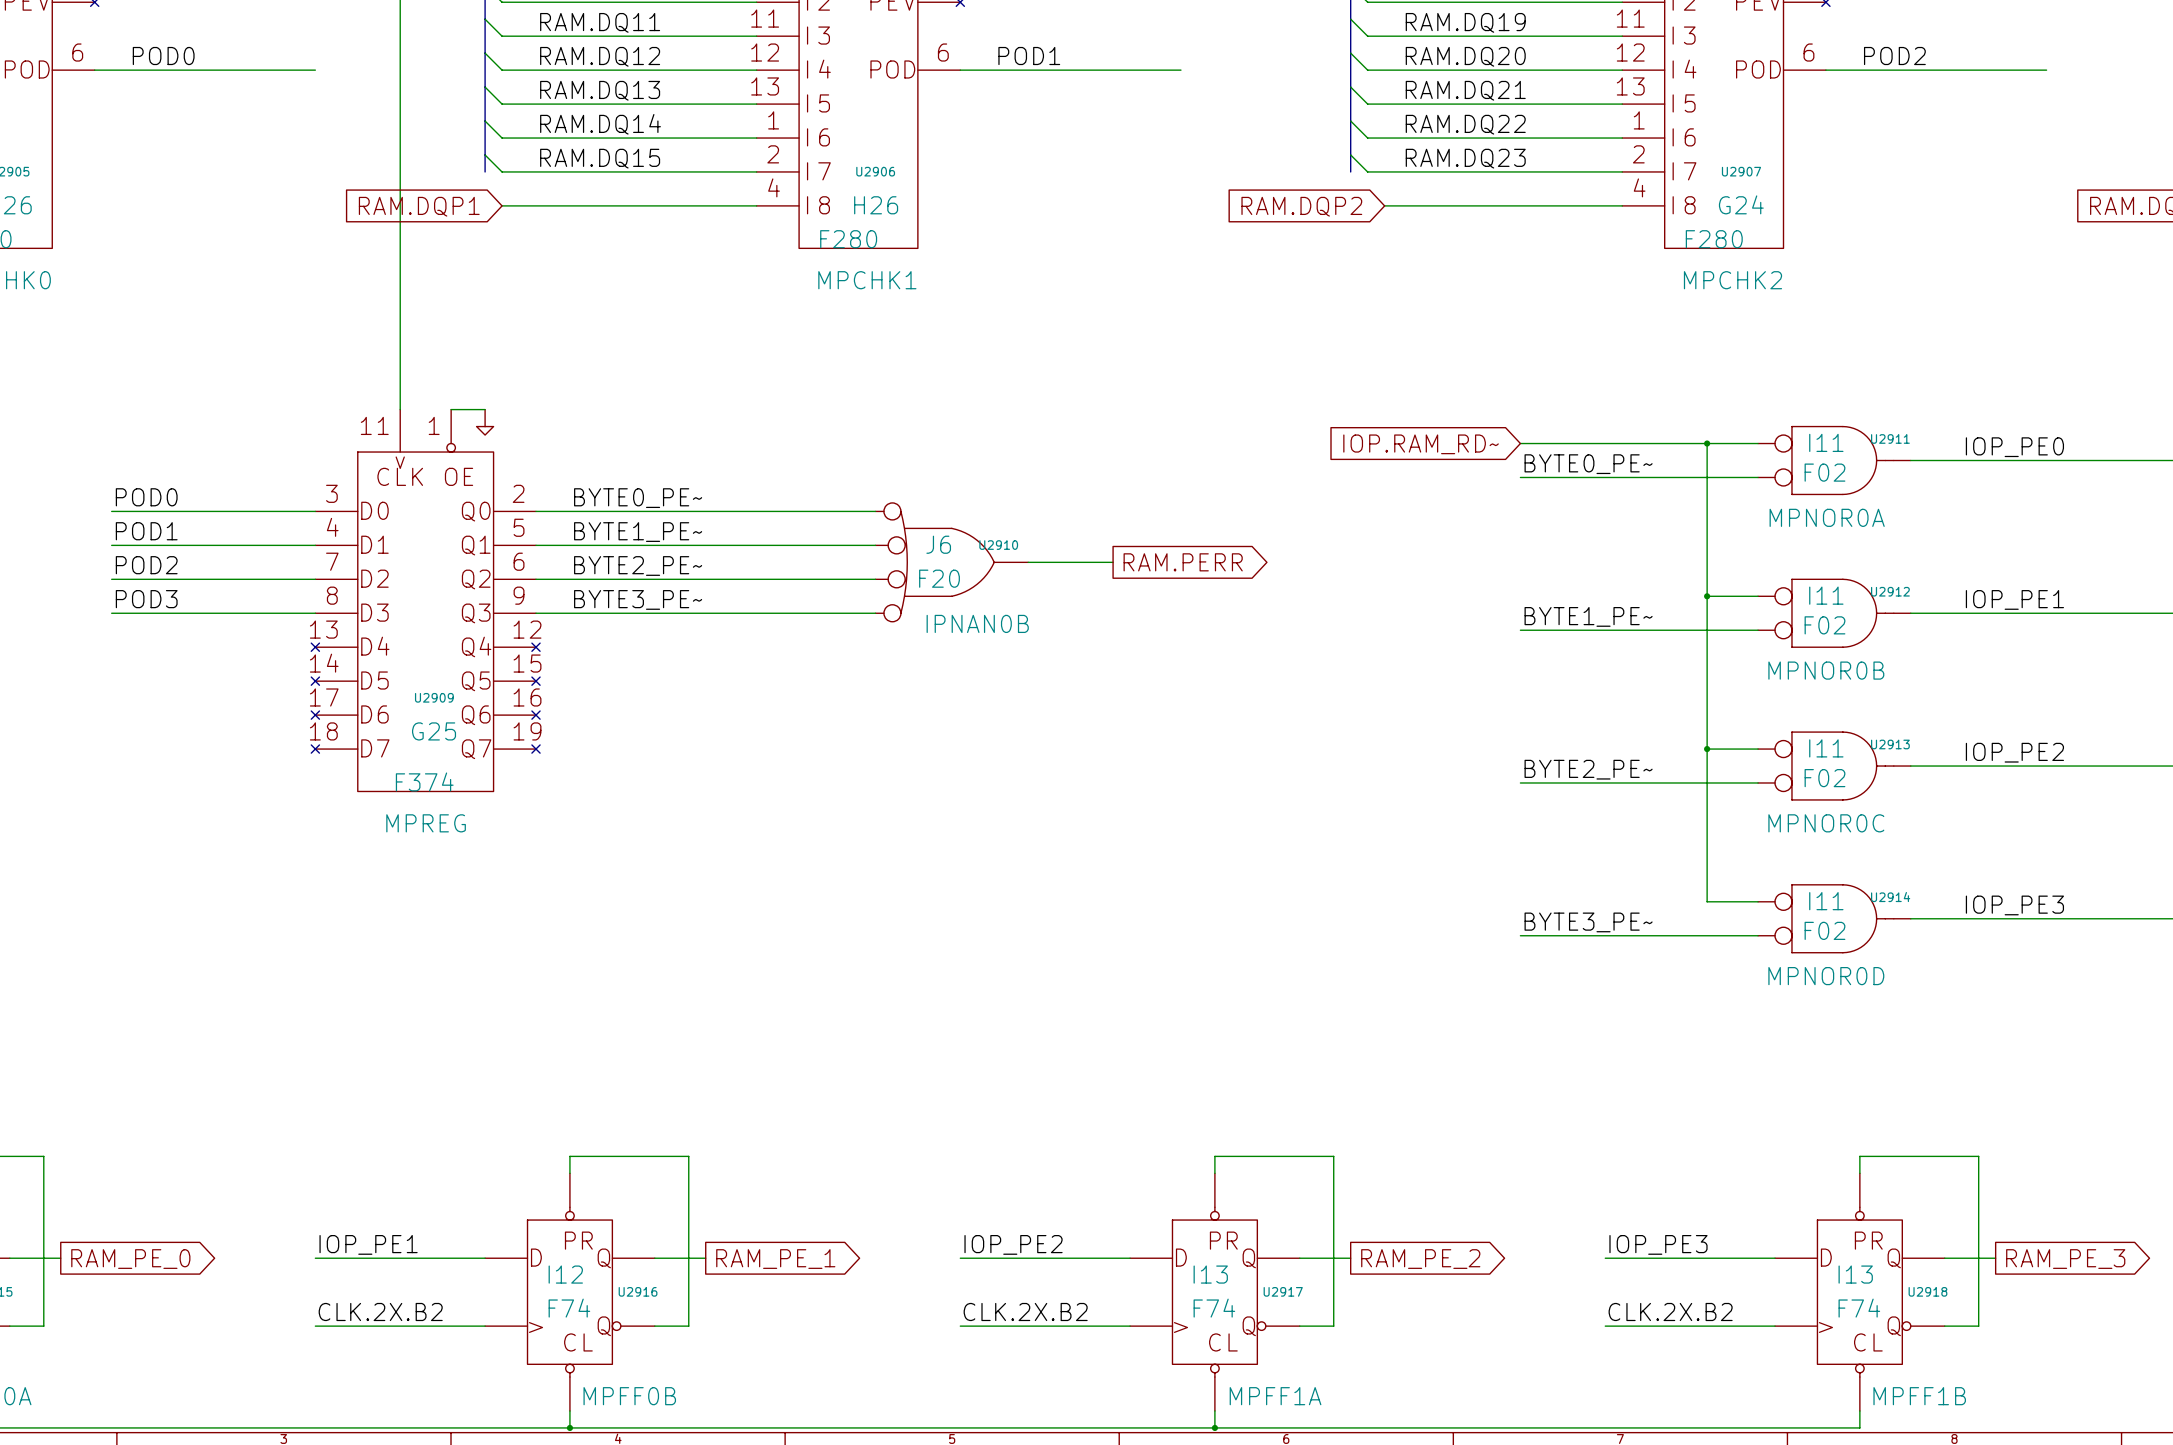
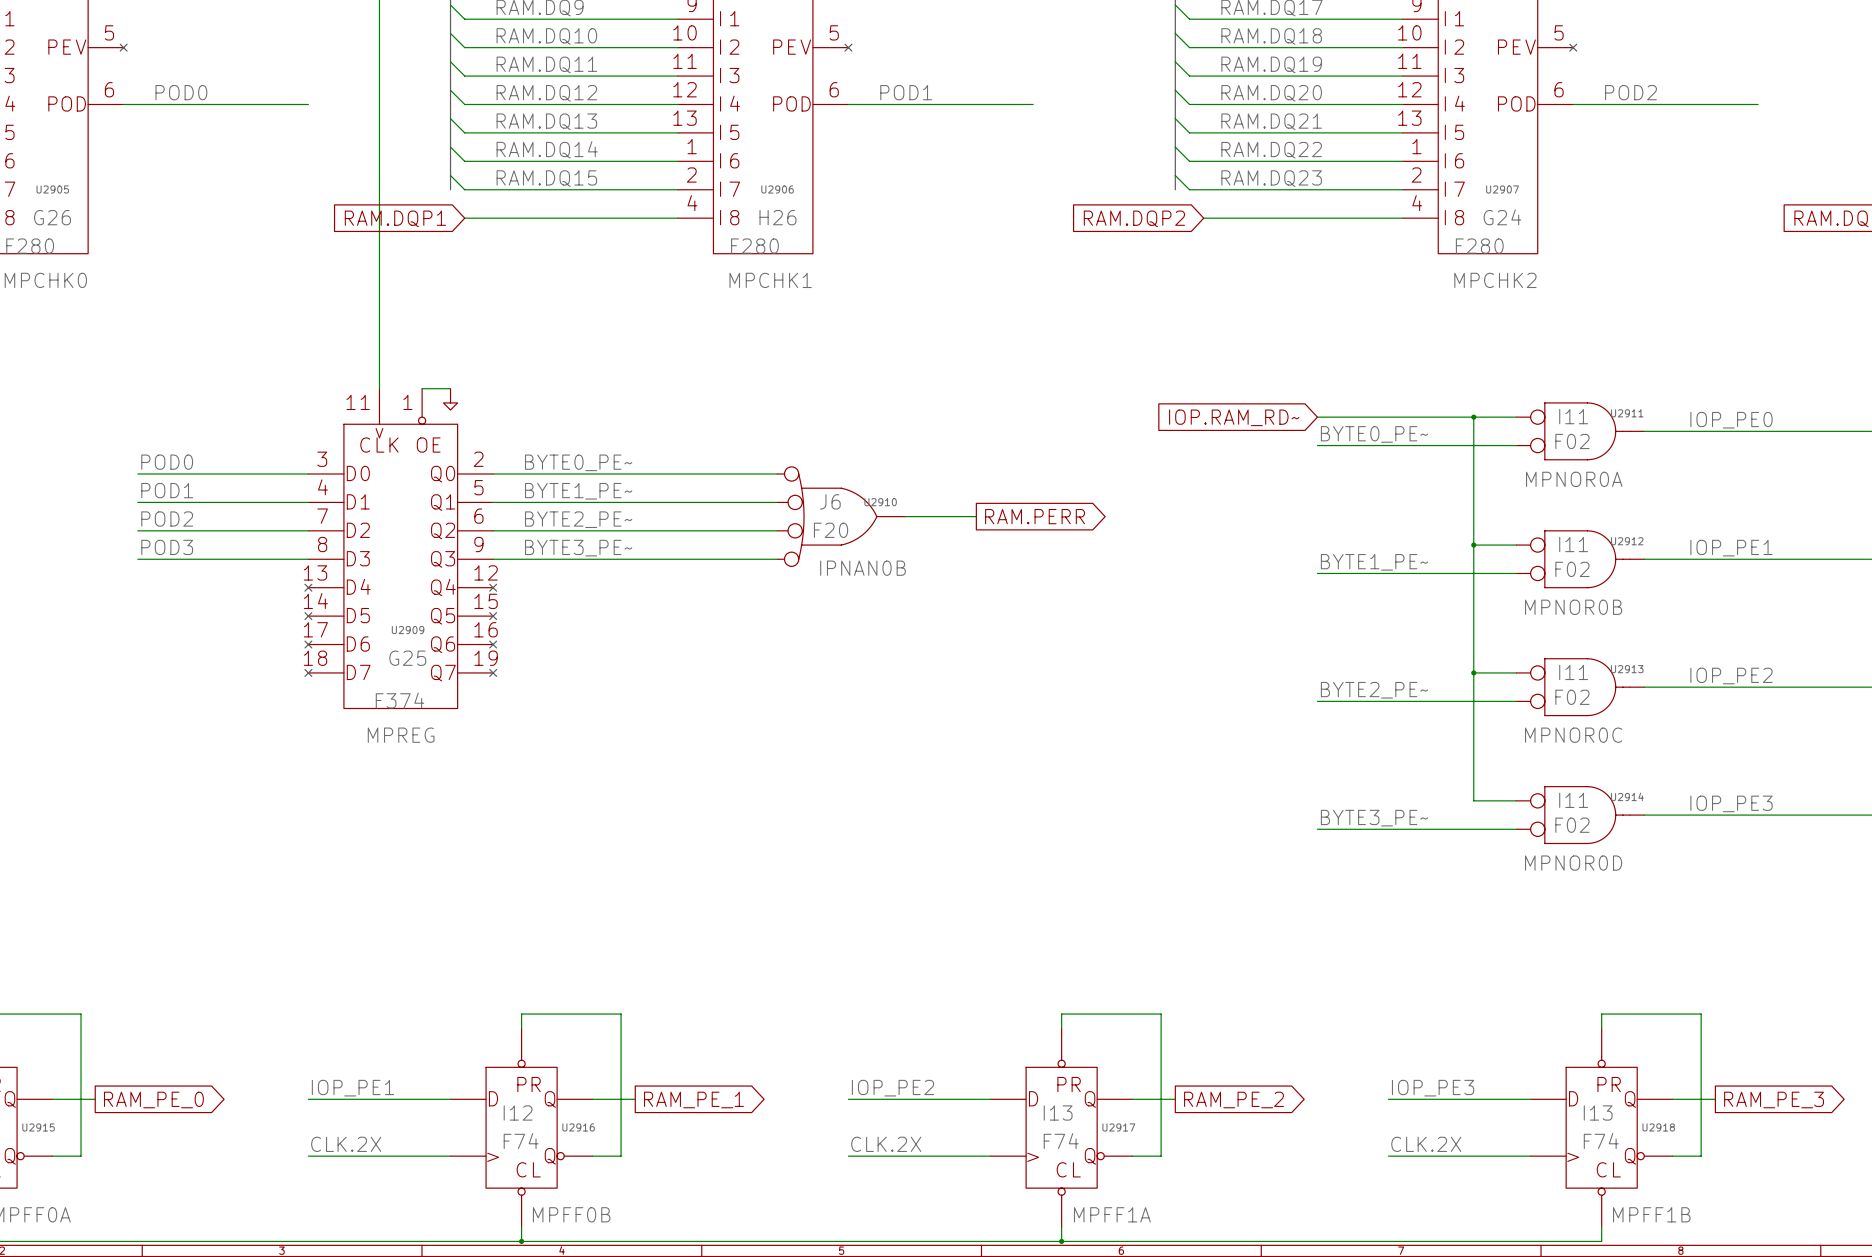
label: CLK.2X.B2 (380, 1311) -> CLK.2X (346, 1144)
label: CLK.2X.B2 (1025, 1311) -> CLK.2X (886, 1144)
label: CLK.2X.B2 (1670, 1311) -> CLK.2X (1426, 1144)

